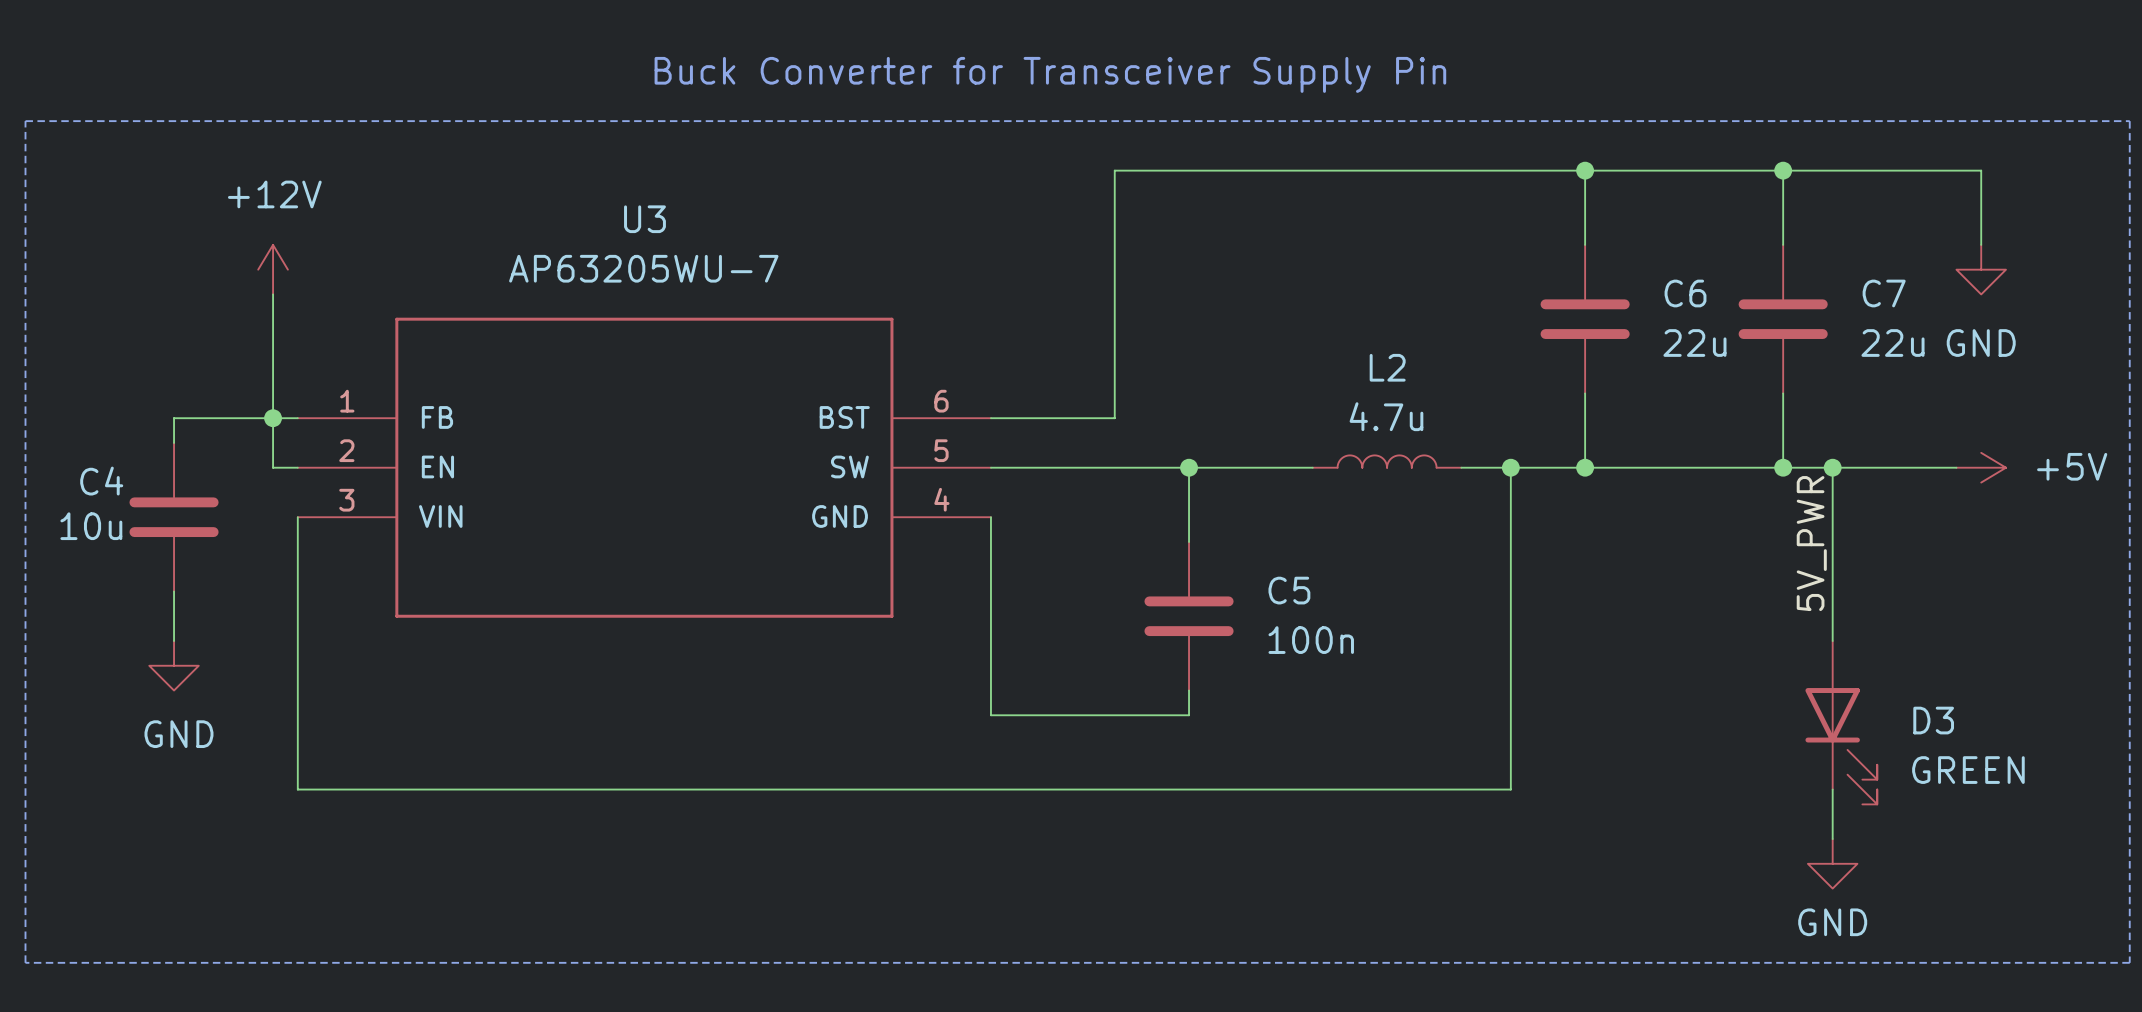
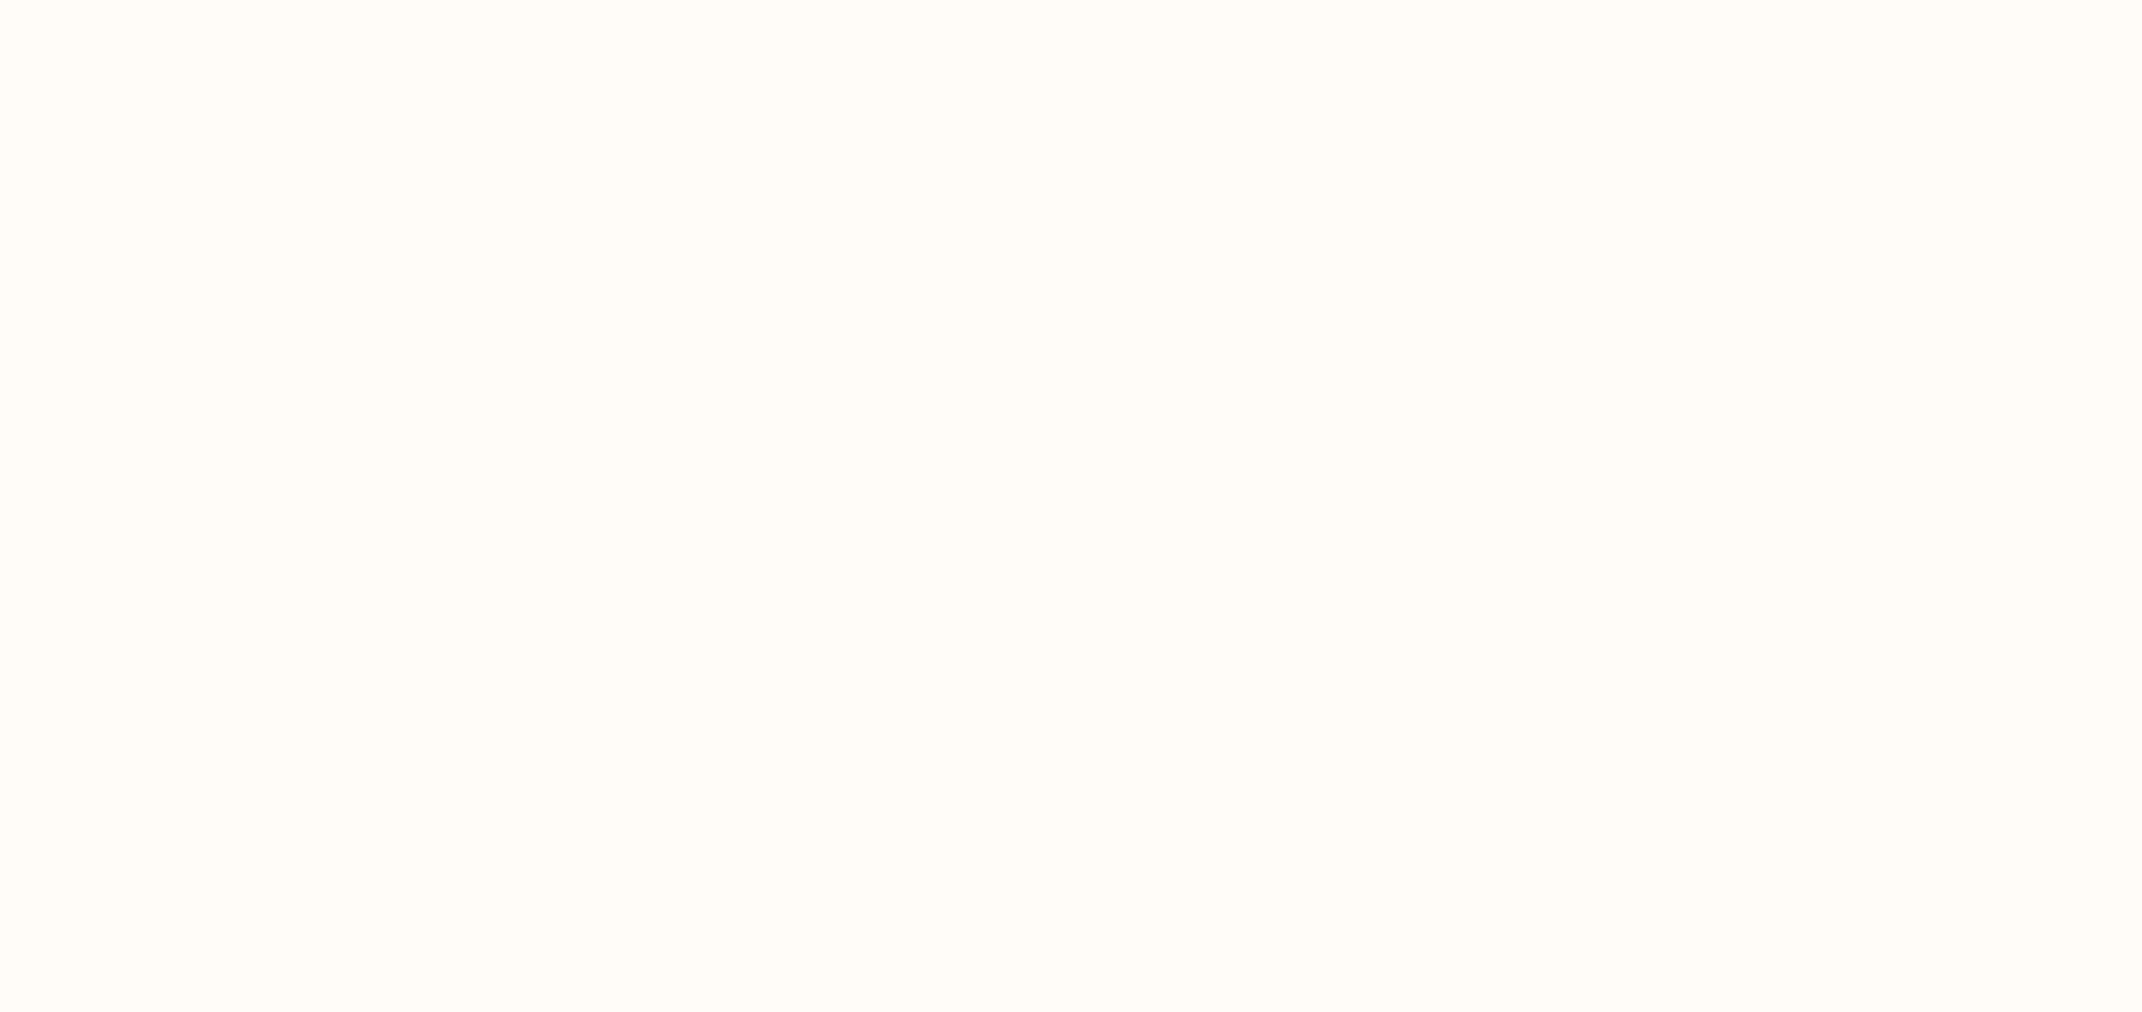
text: Buck Converter for Transceiver Supply Pin (1050, 74) -> none
line: (25, 121) (2129, 121) (2129, 962) (25, 962) (25, 121) -> none
wire: (1585, 170) (1585, 244) -> none
junction: (1585, 170) -> none
wire: (1783, 170) (1783, 244) -> none
junction: (1783, 170) -> none
wire: (1981, 244) (1981, 170) (1114, 170) (1114, 418) (990, 418) -> none
power symbol: +12V (273, 269) -> none
power symbol: GND (1981, 269) -> none
wire: (273, 294) (273, 467) (297, 467) -> none
C6: 22u (1585, 319) -> none
C7: 22u (1783, 319) -> none
wire: (1585, 393) (1585, 467) -> none
wire: (1783, 393) (1783, 467) -> none
junction: (273, 418) -> none
wire: (297, 418) (174, 418) (174, 442) -> none
L2: 4.7u (1387, 461) -> none
U3: AP63205WU-7 (644, 467) -> none
wire: (990, 467) (1312, 467) -> none
wire: (1189, 467) (1189, 541) -> none
junction: (1189, 467) -> none
wire: (1461, 467) (1956, 467) -> none
wire: (1510, 467) (1510, 789) (297, 789) (297, 517) -> none
junction: (1510, 467) -> none
junction: (1585, 467) -> none
junction: (1783, 467) -> none
wire: (1832, 467) (1832, 641) -> none
junction: (1832, 467) -> none
power symbol: +5V (1981, 467) -> none
C4: 10u (174, 517) -> none
wire: (990, 517) (990, 715) (1189, 715) (1189, 690) -> none
label: 5V_PWR (1811, 543) -> none
wire: (174, 591) (174, 641) -> none
C5: 100n (1189, 616) -> none
power symbol: GND (174, 665) -> none
D3: GREEN (1841, 722) -> none
wire: (1832, 789) (1832, 839) -> none
power symbol: GND (1832, 863) -> none

